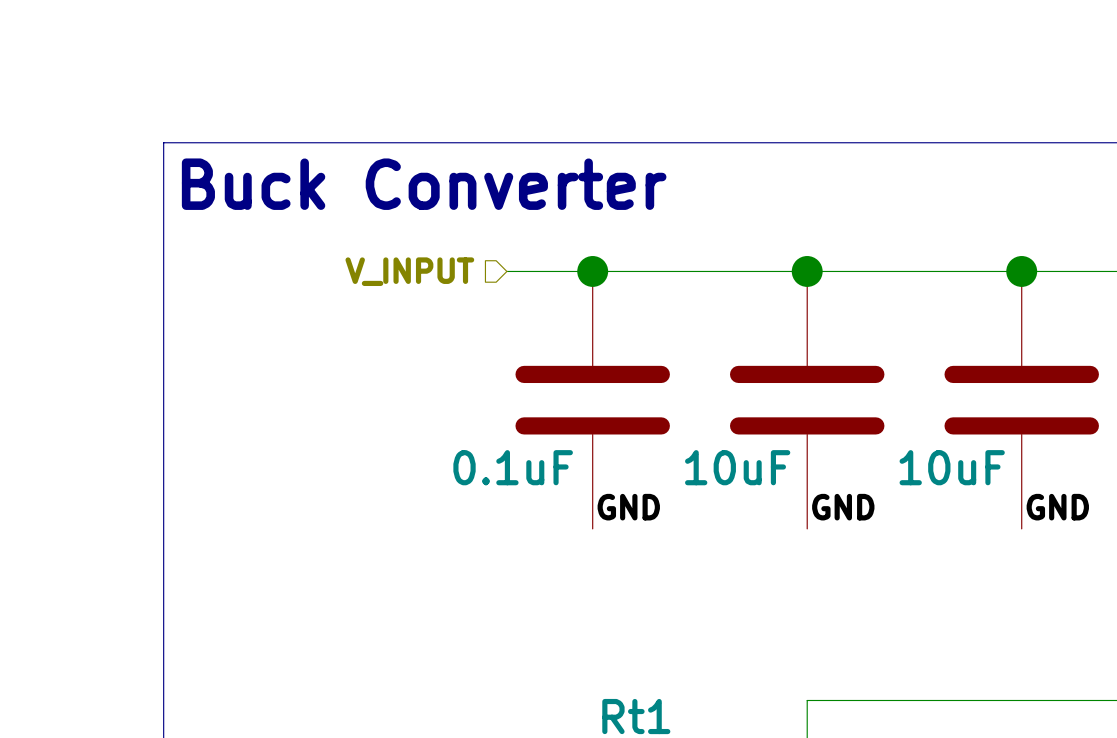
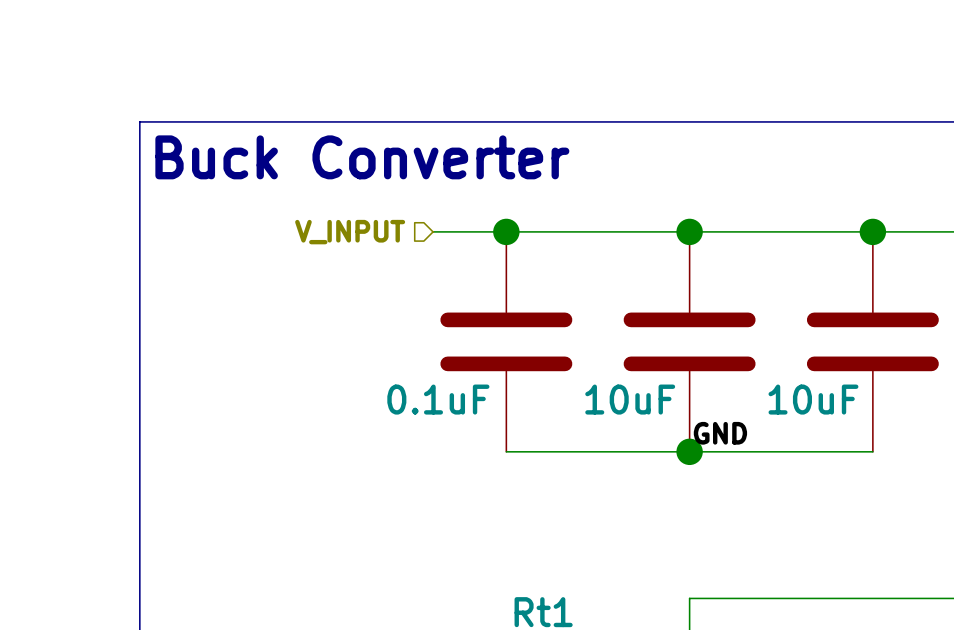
label: GND (628, 507) -> none
label: GND (1057, 507) -> none
wire: none -> (506, 451) (872, 451)
junction: none -> (689, 451)

